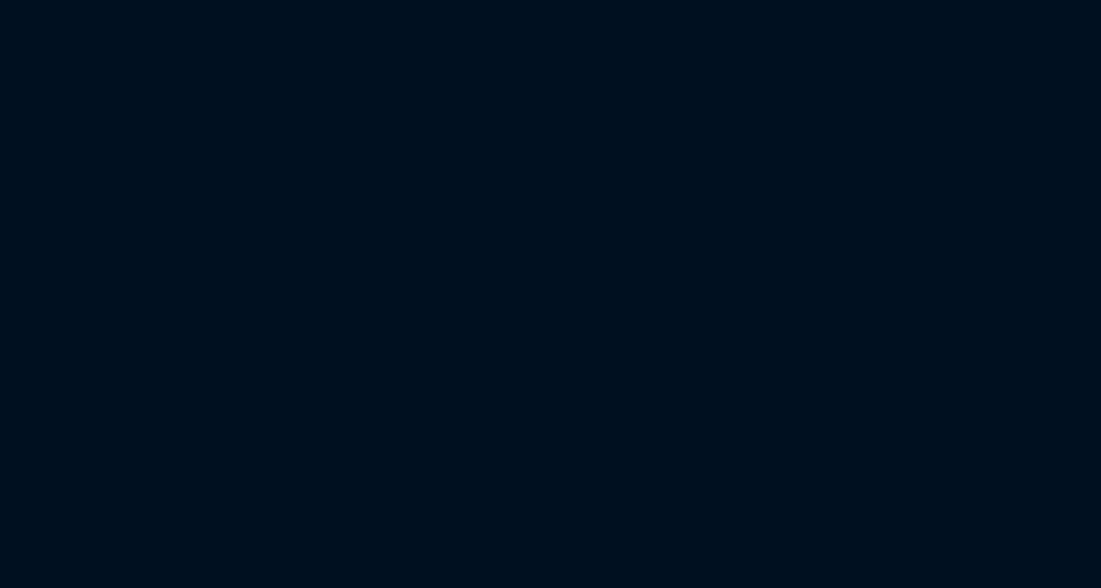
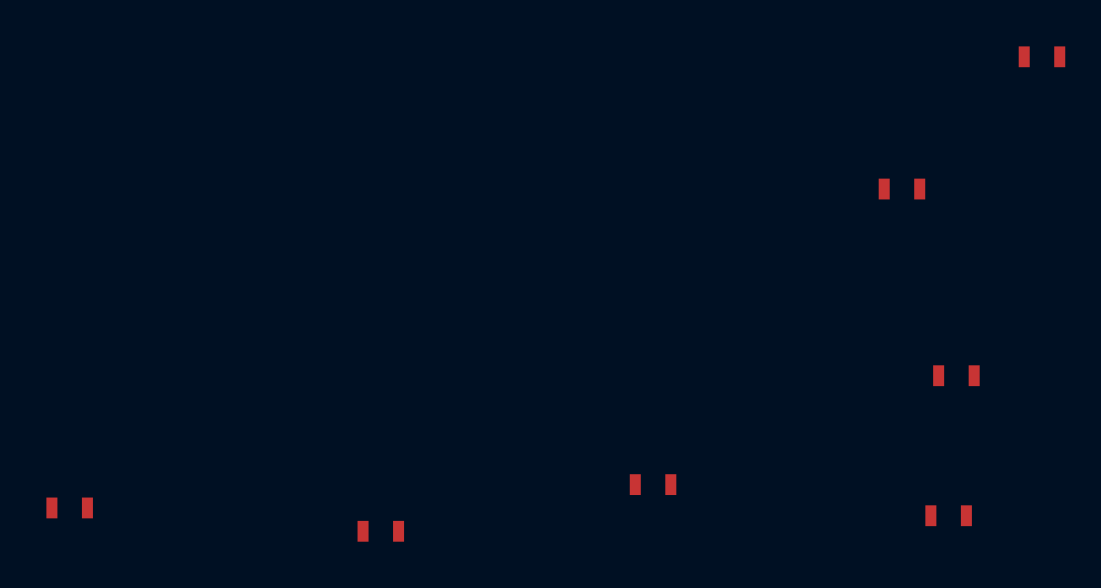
part: none -> (1041, 56)
part: none -> (901, 189)
part: none -> (956, 375)
part: none -> (653, 484)
part: none -> (69, 507)
part: none -> (948, 515)
part: none -> (380, 531)

